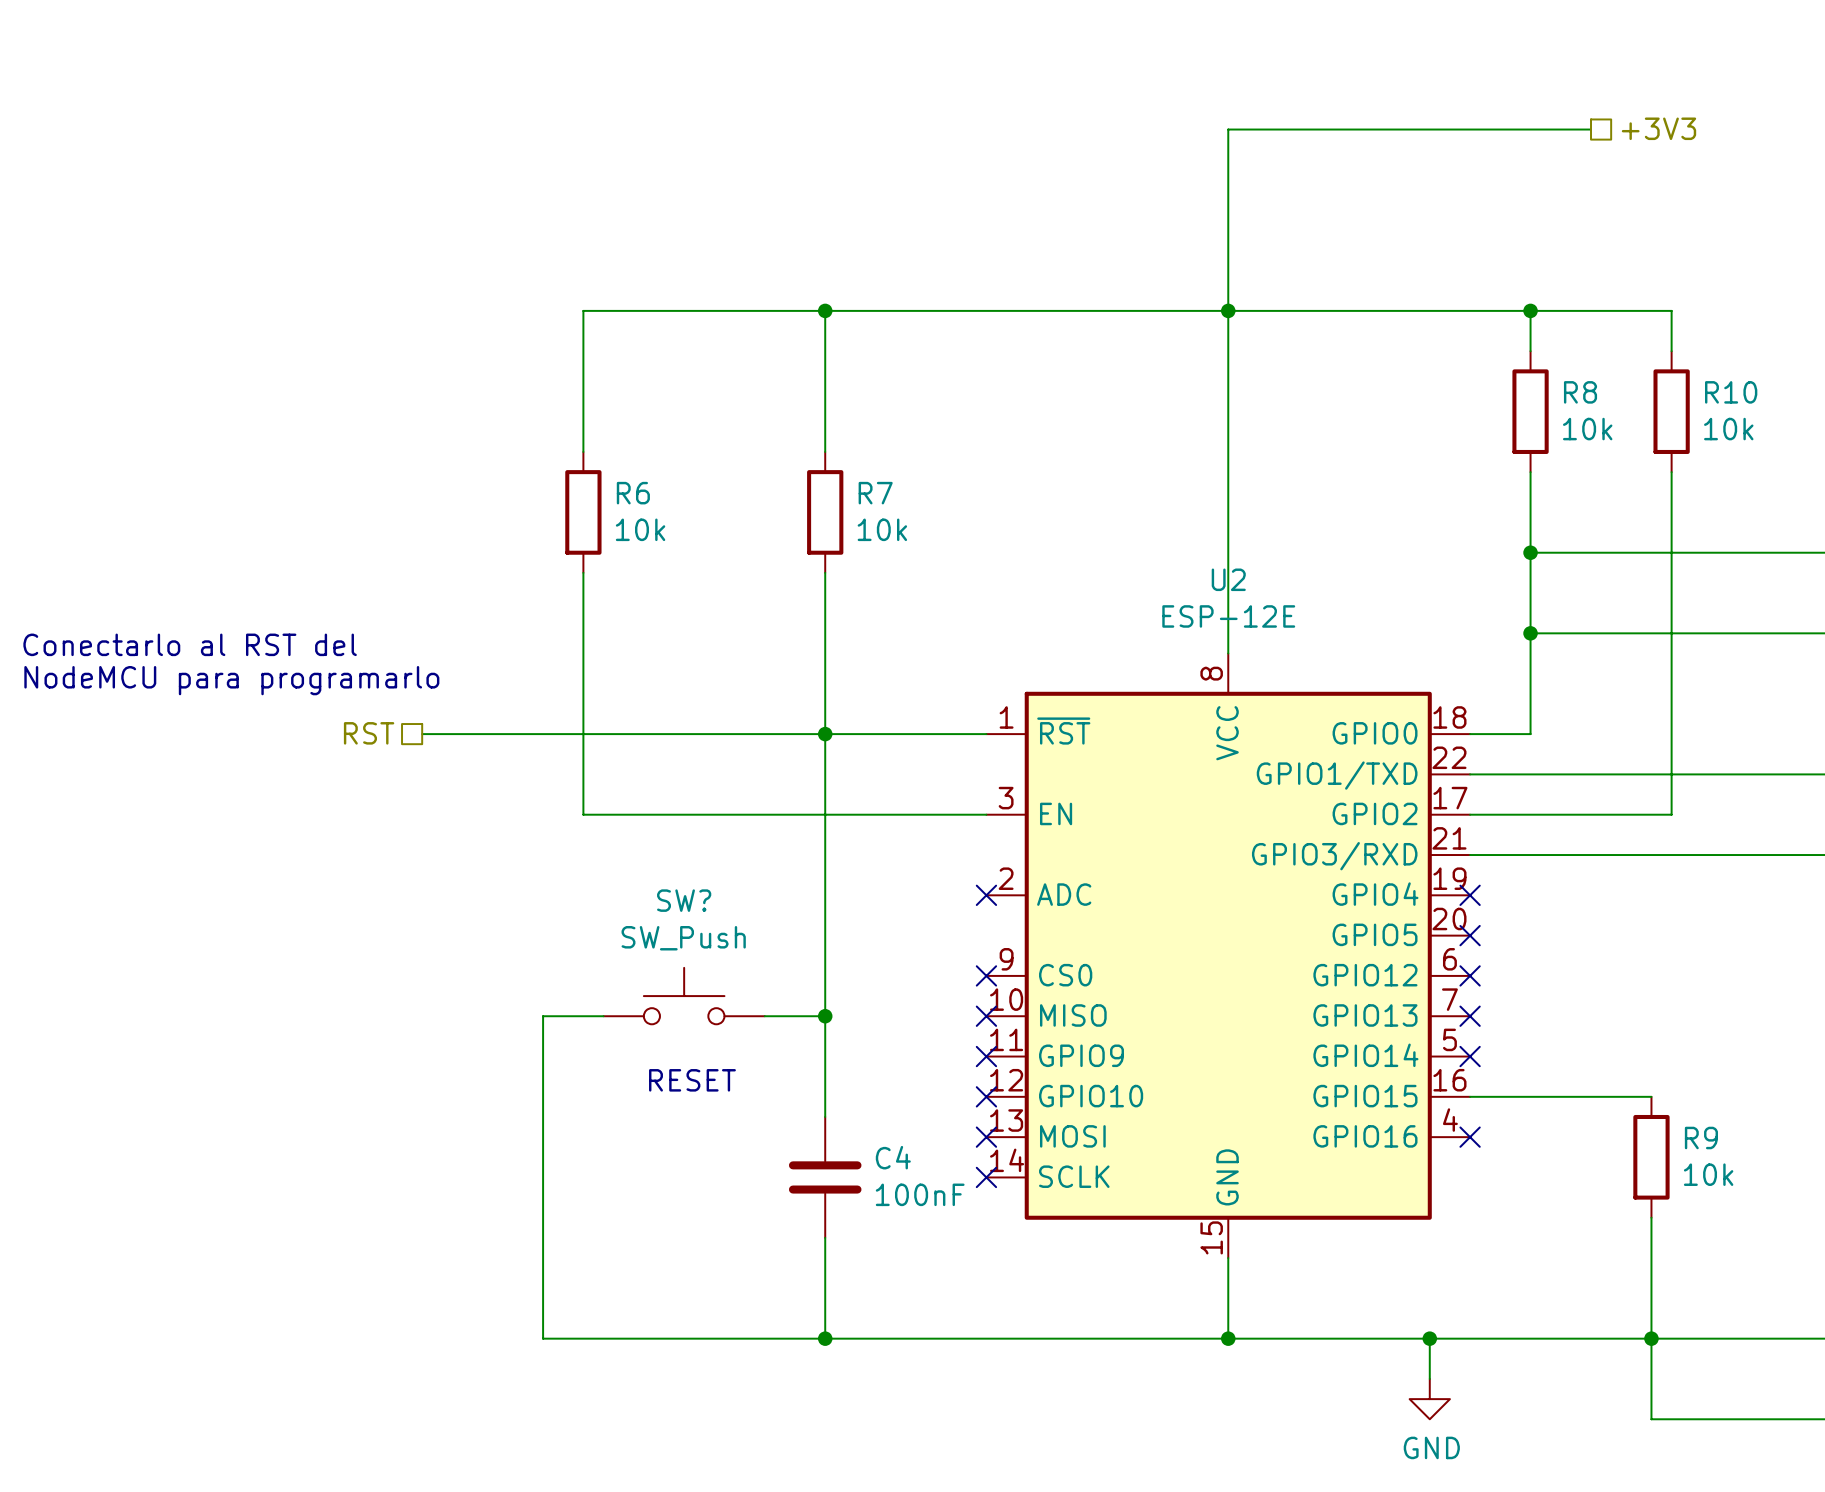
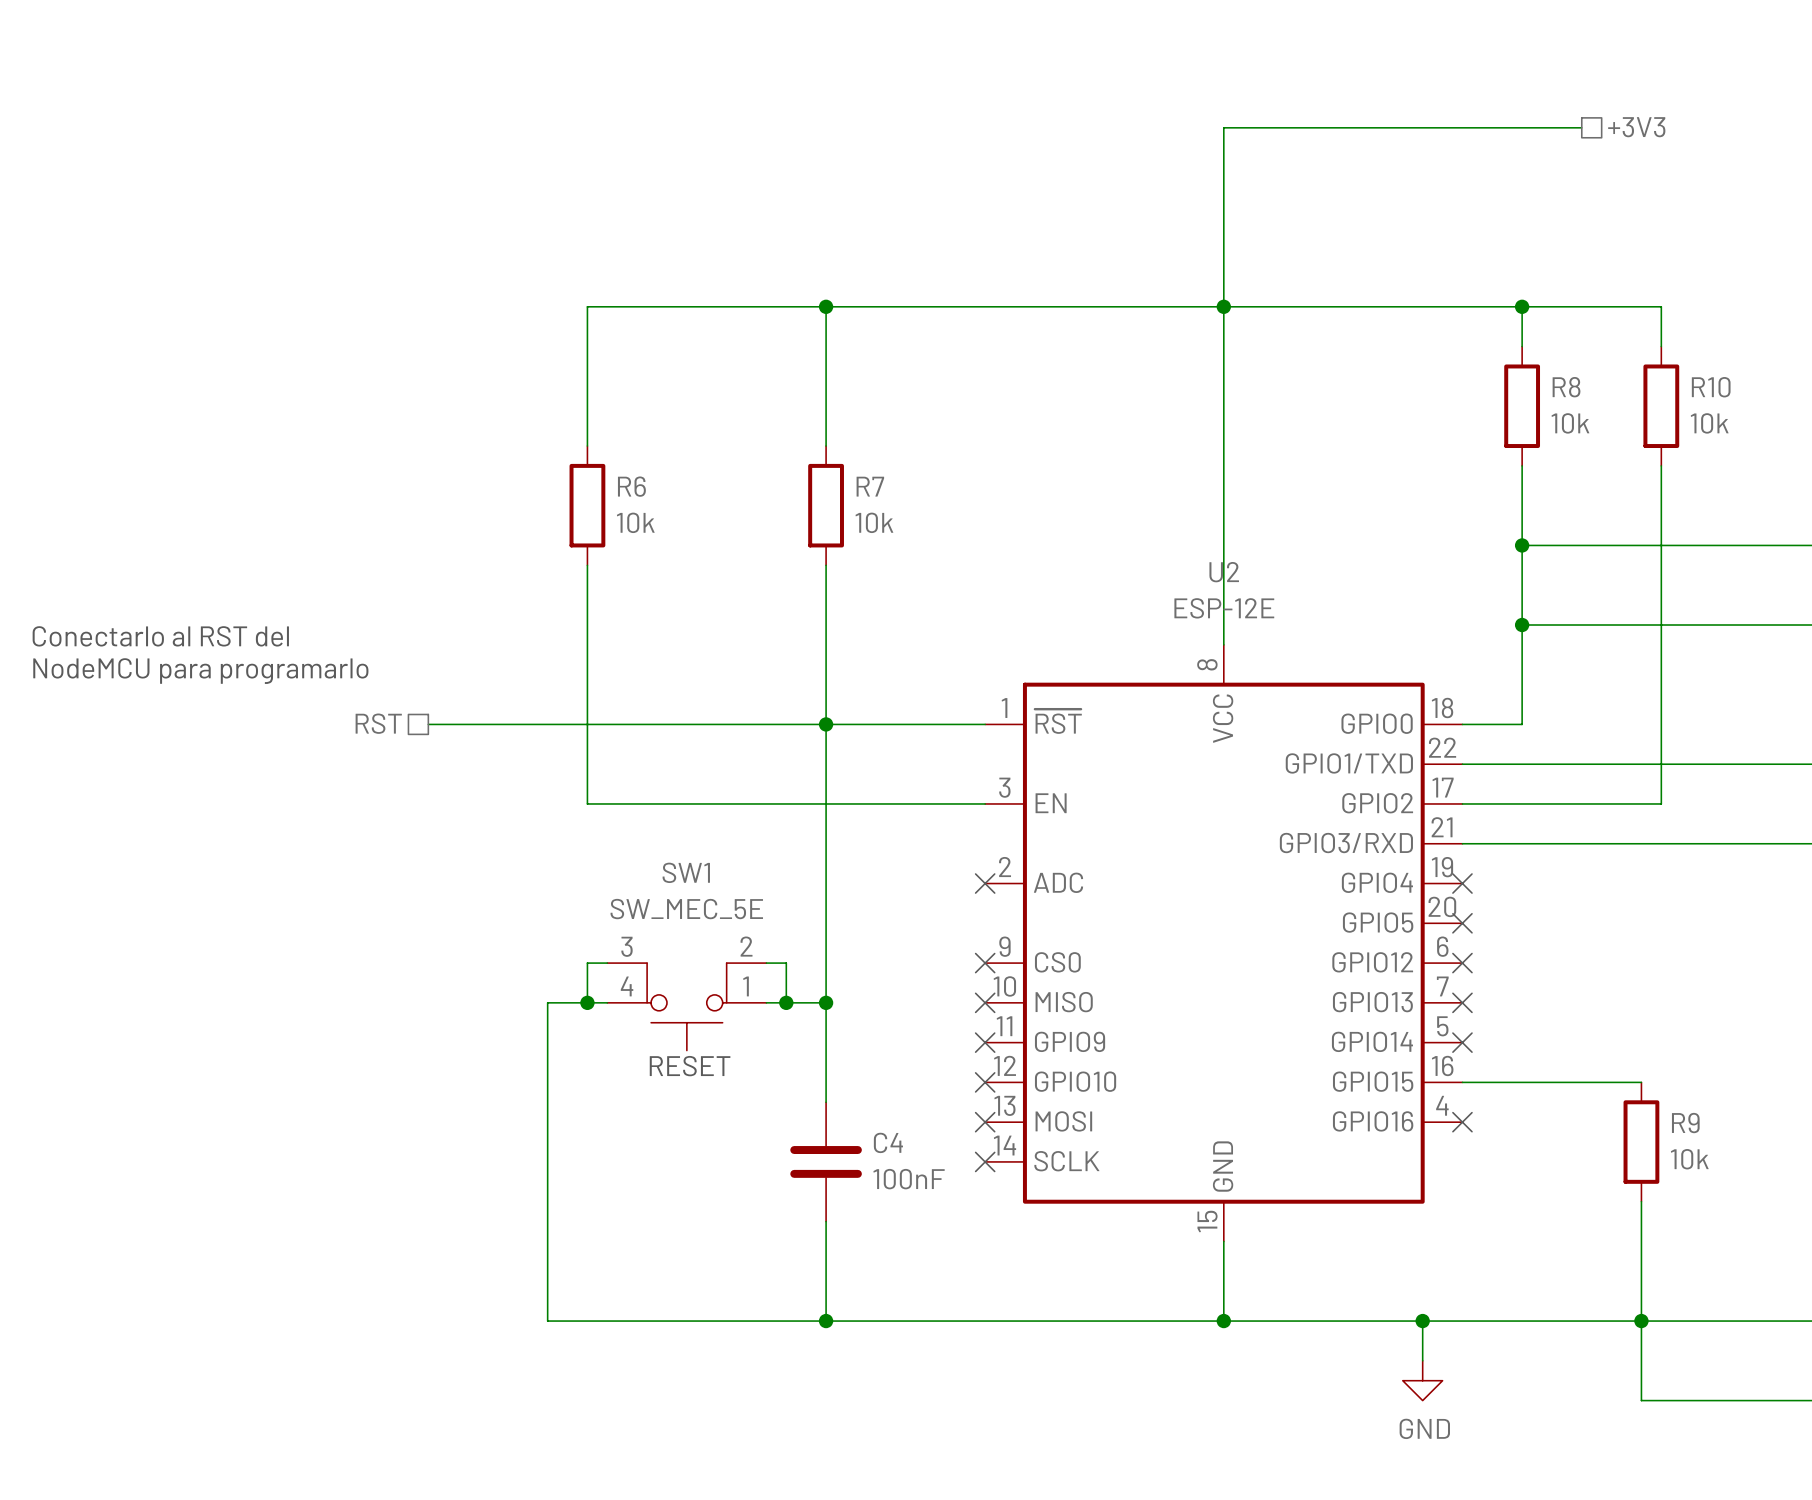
wire: none -> (607, 963) (587, 963) (587, 1002)
wire: none -> (766, 963) (786, 963) (786, 1002)
SW?: SW_Push (684, 996) -> none
junction: none -> (587, 1002)
junction: none -> (786, 1002)
SW1: none -> SW_MEC_5E (686, 1006)

